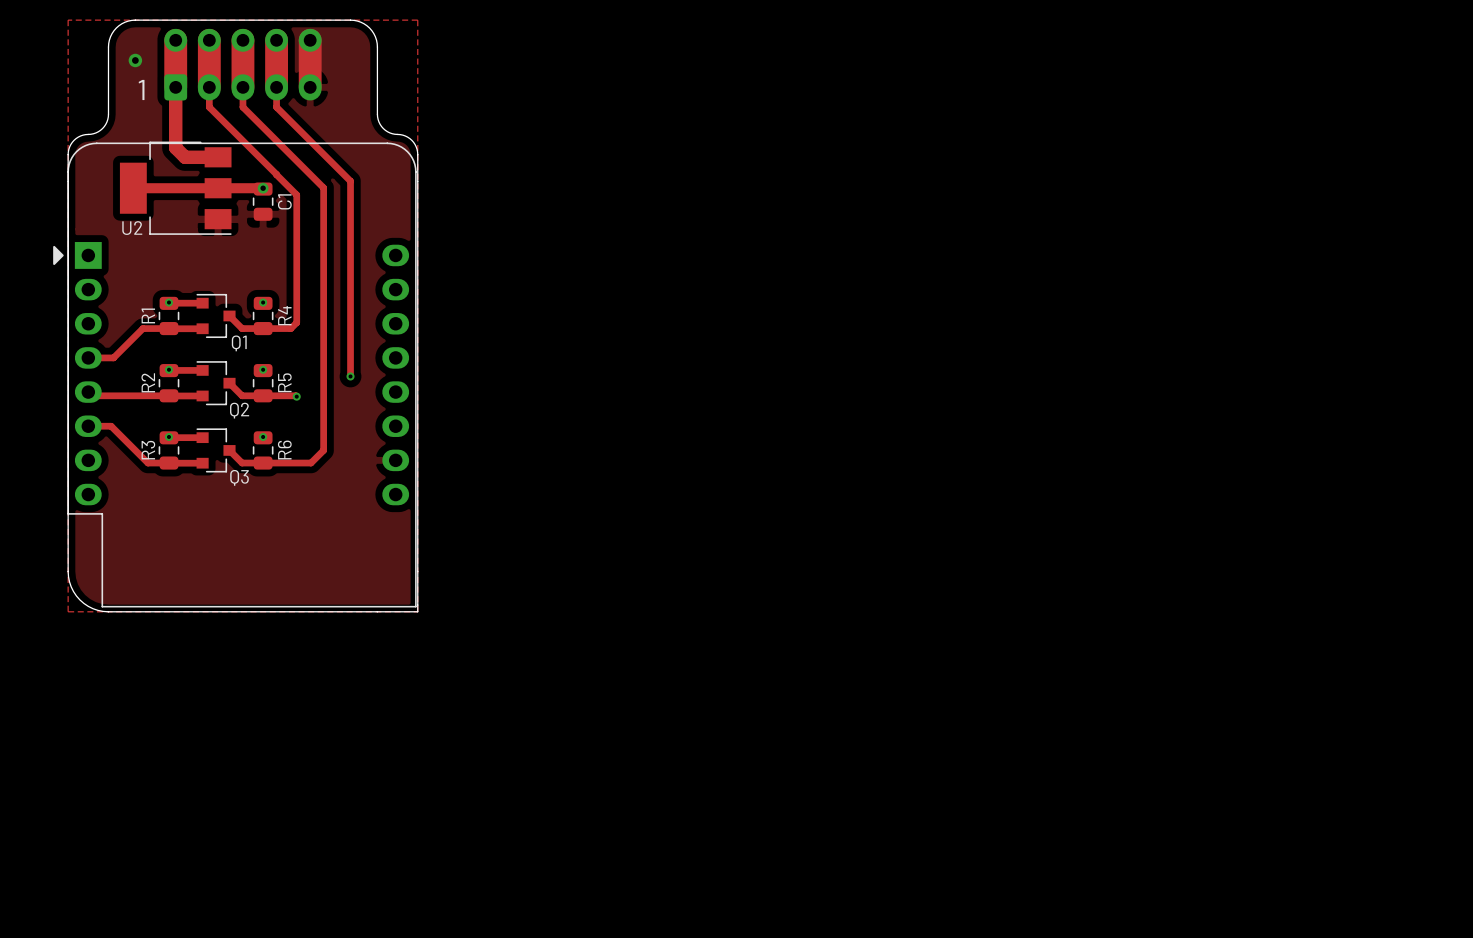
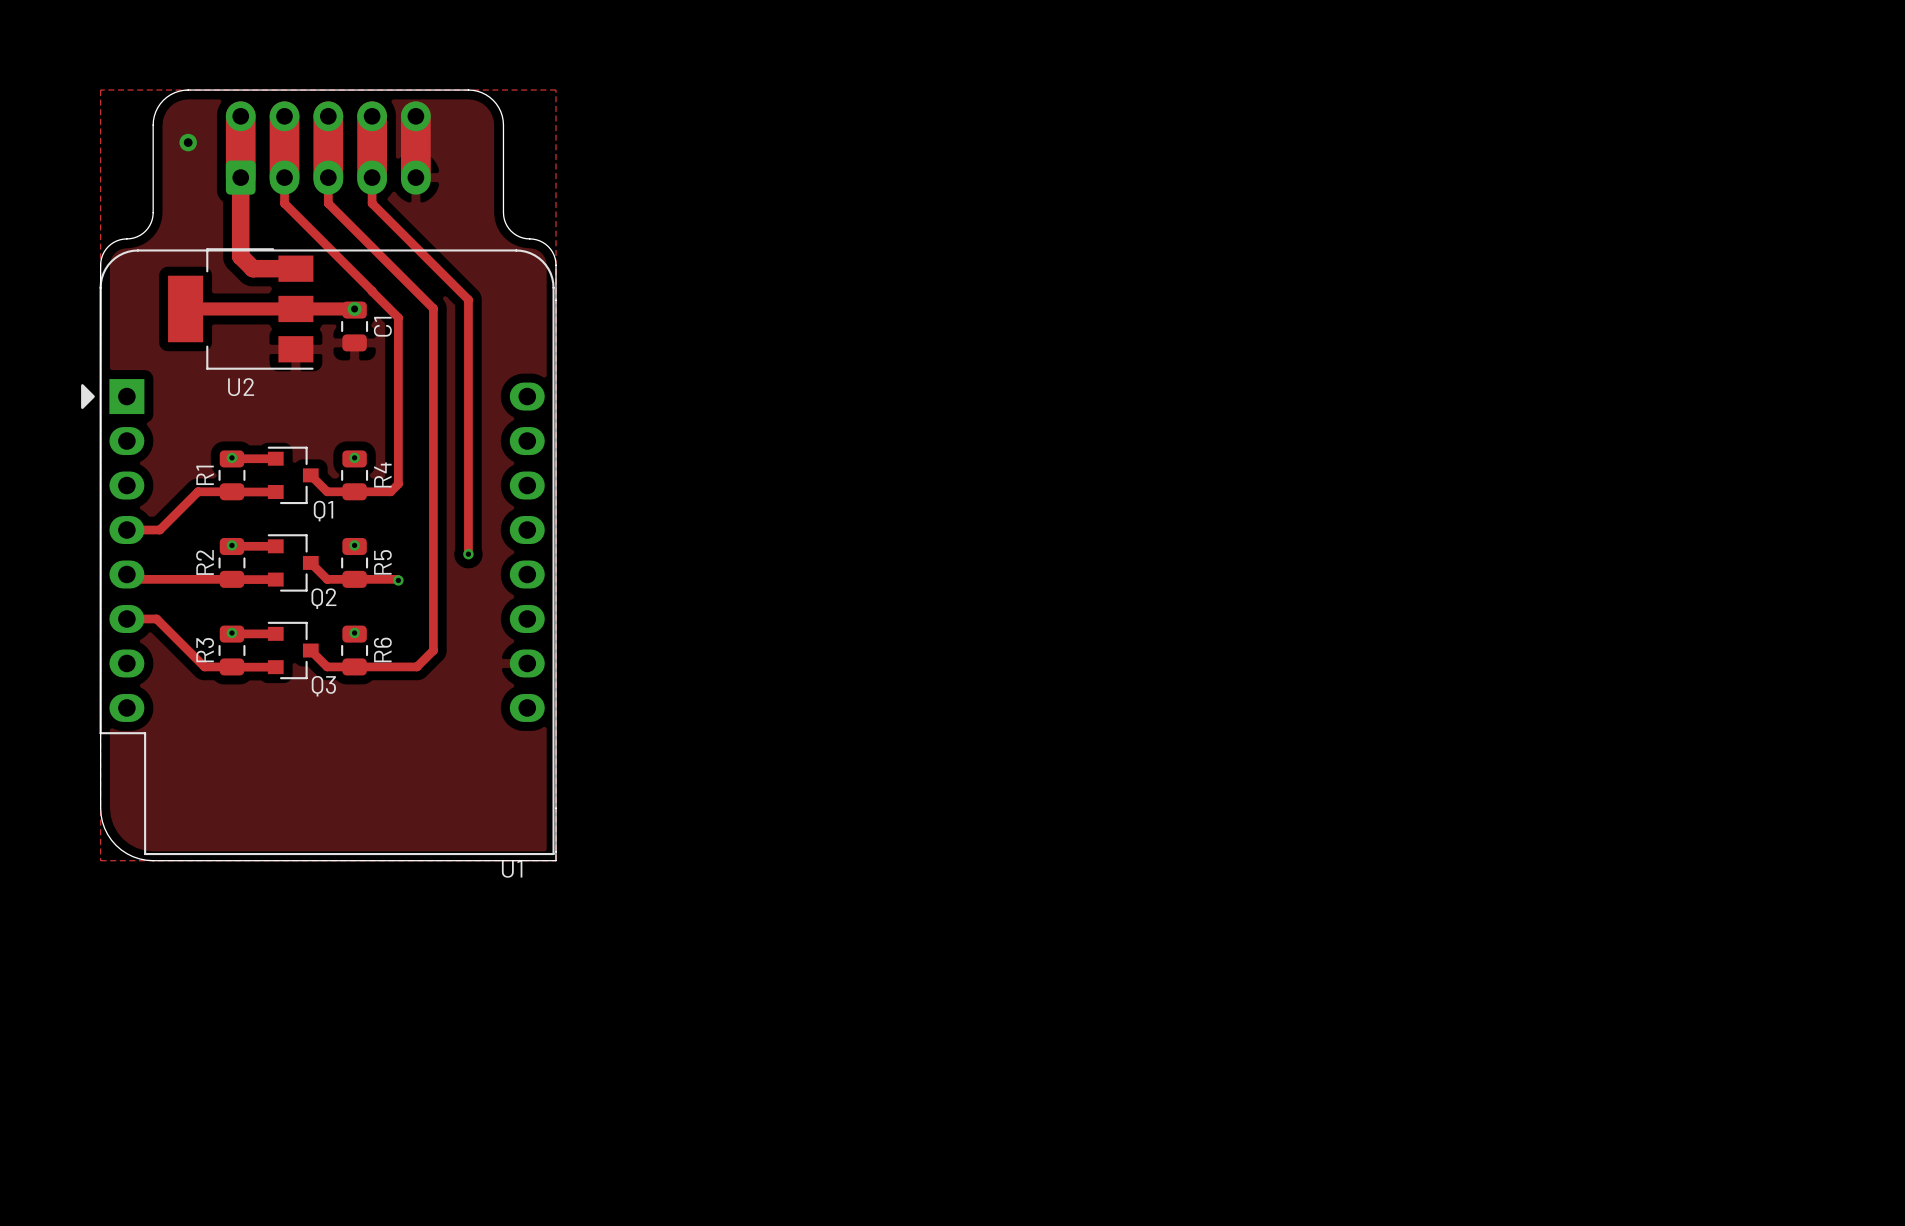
text: 1 (141, 89) -> none
U2 name position: U2 (132, 228) -> U2 (241, 387)
U1 name: none -> U1 (512, 868)

